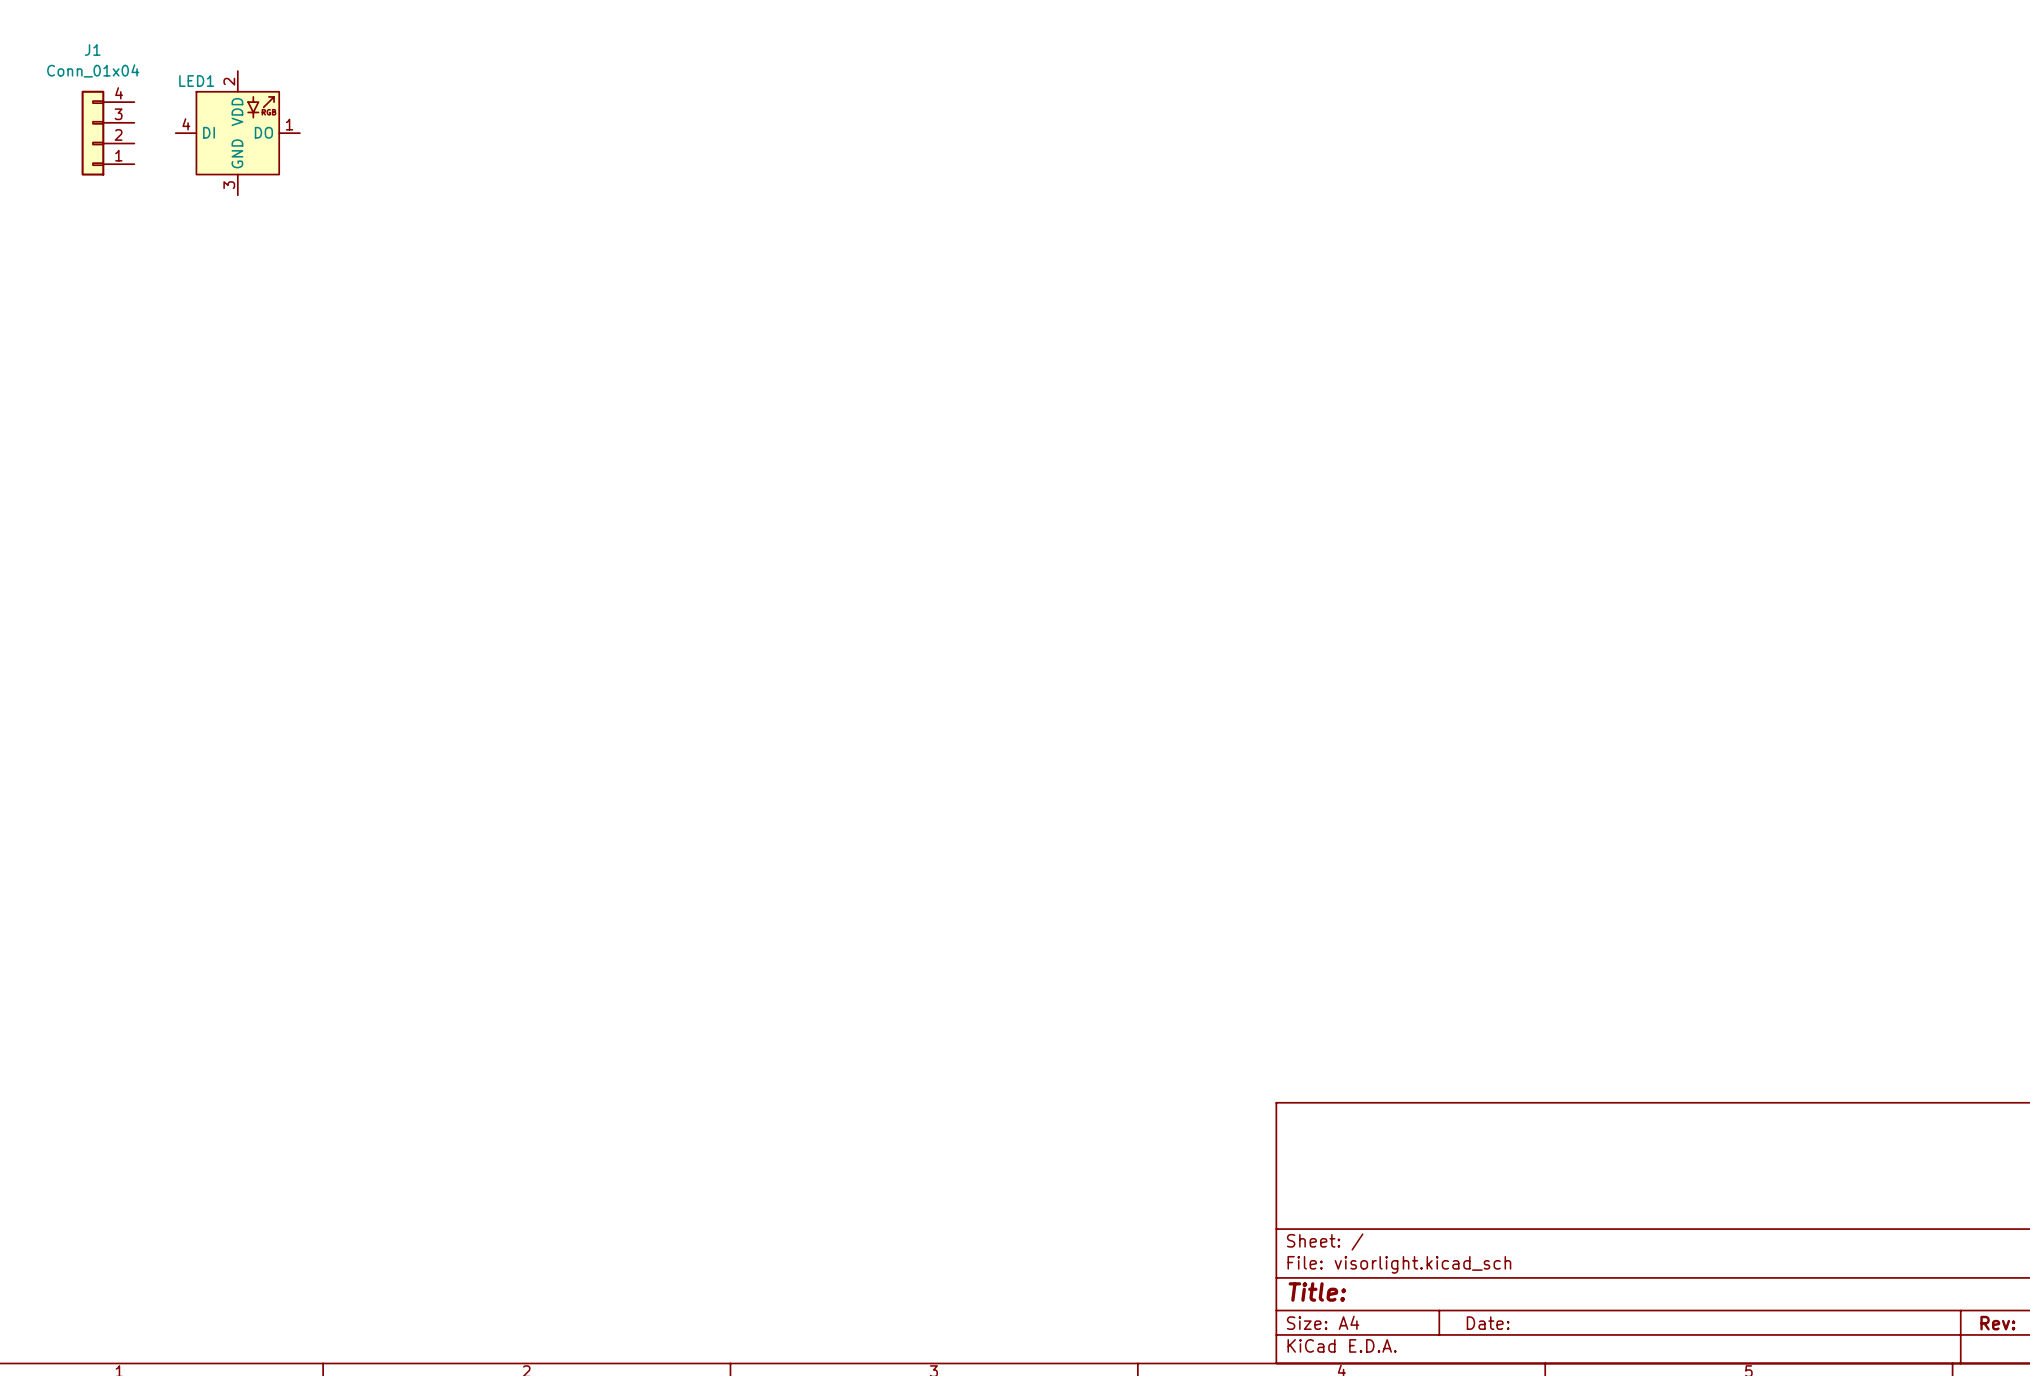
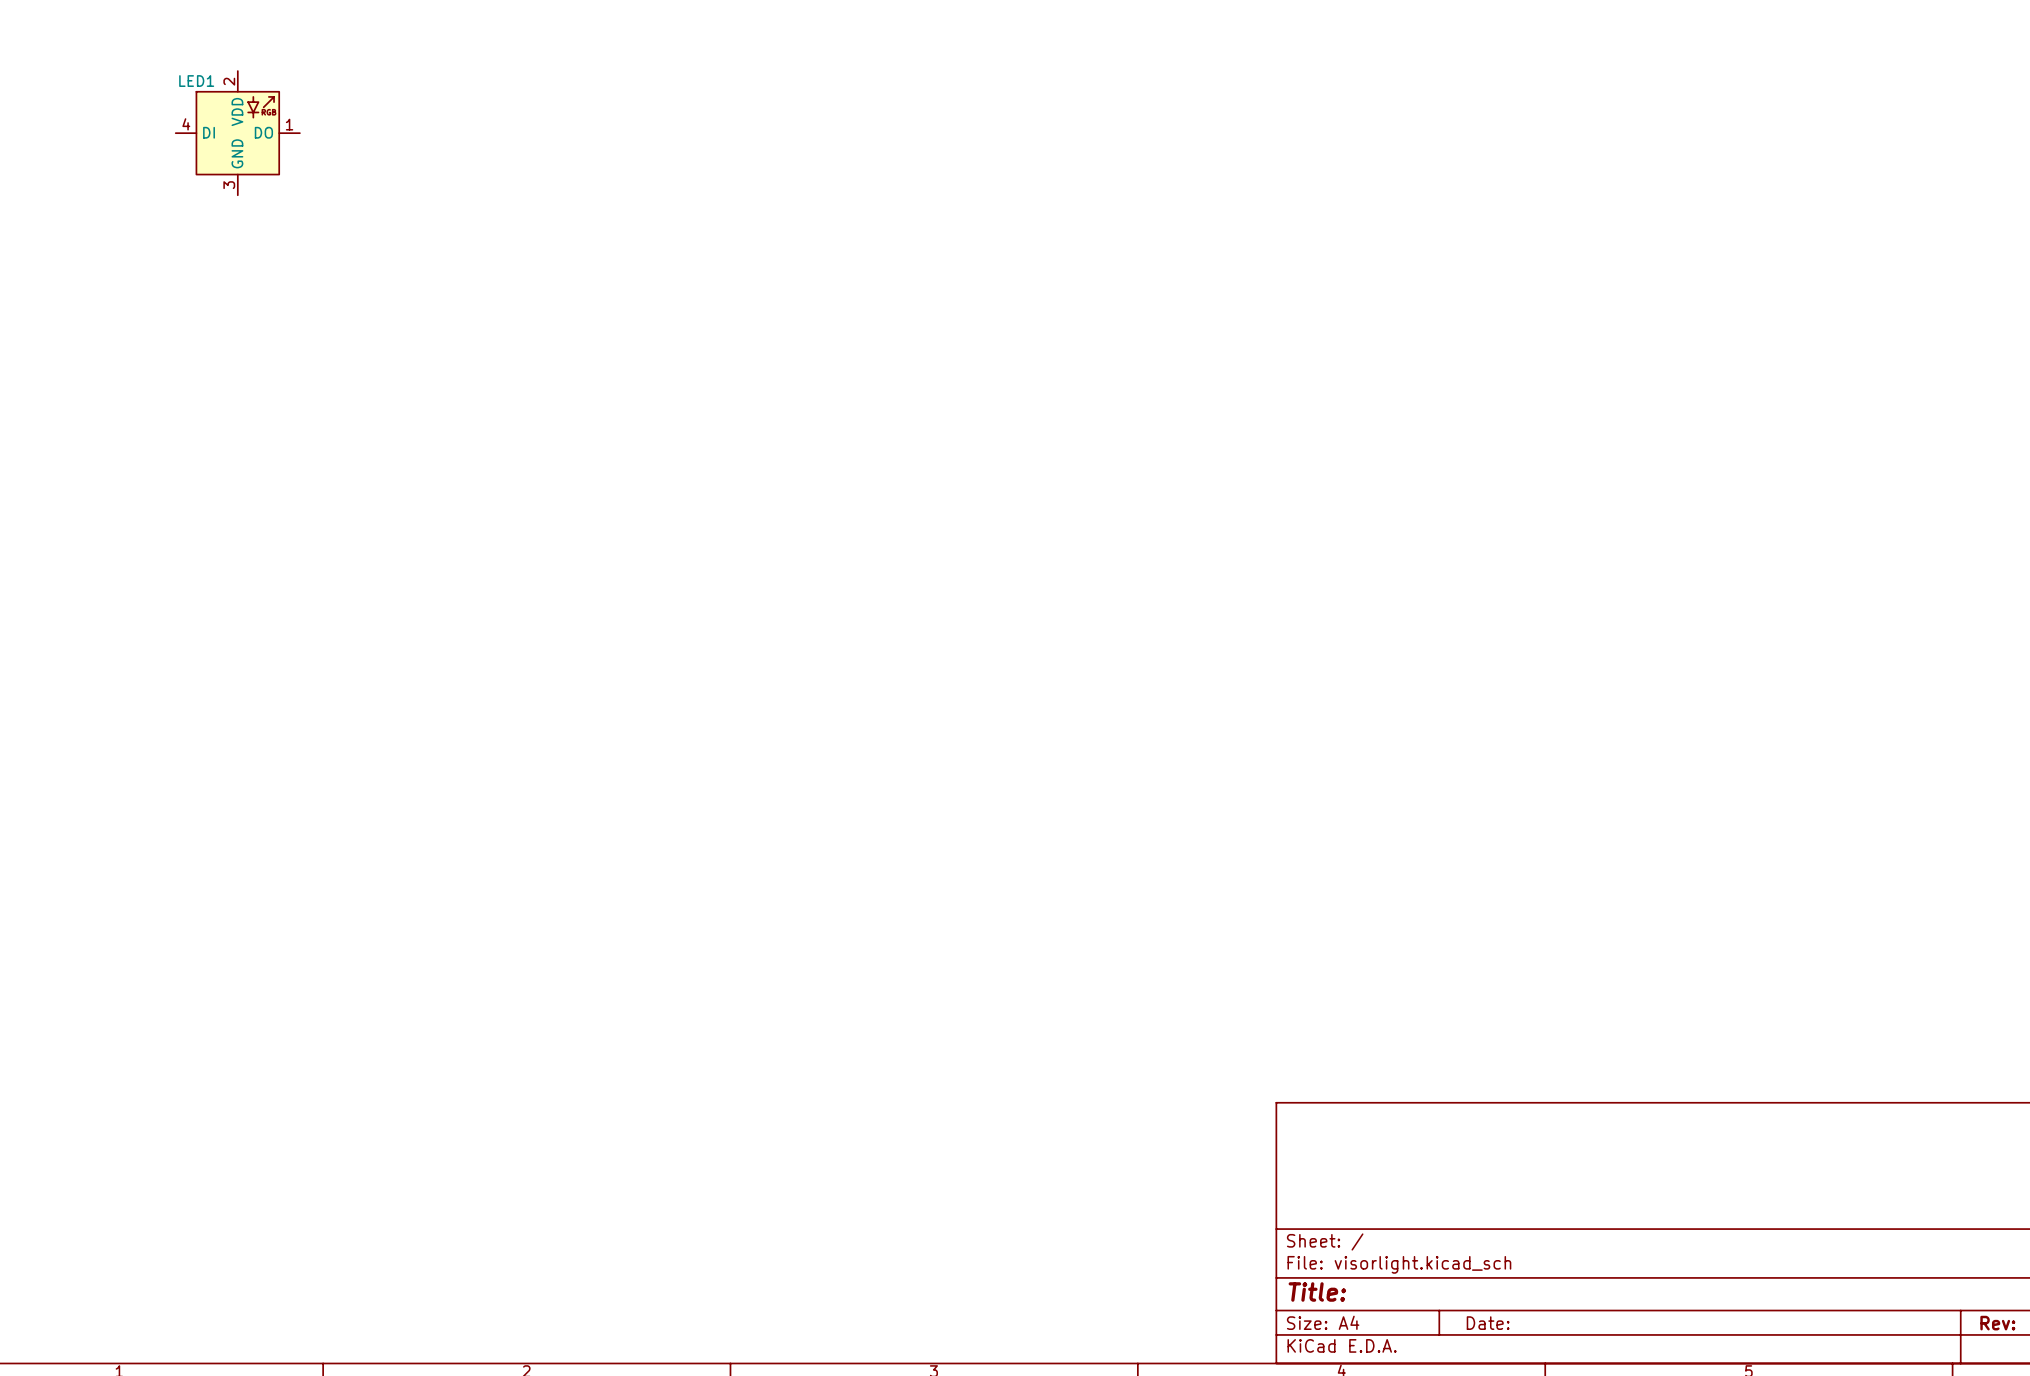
J1: Conn_01x04 (107, 133) -> none

